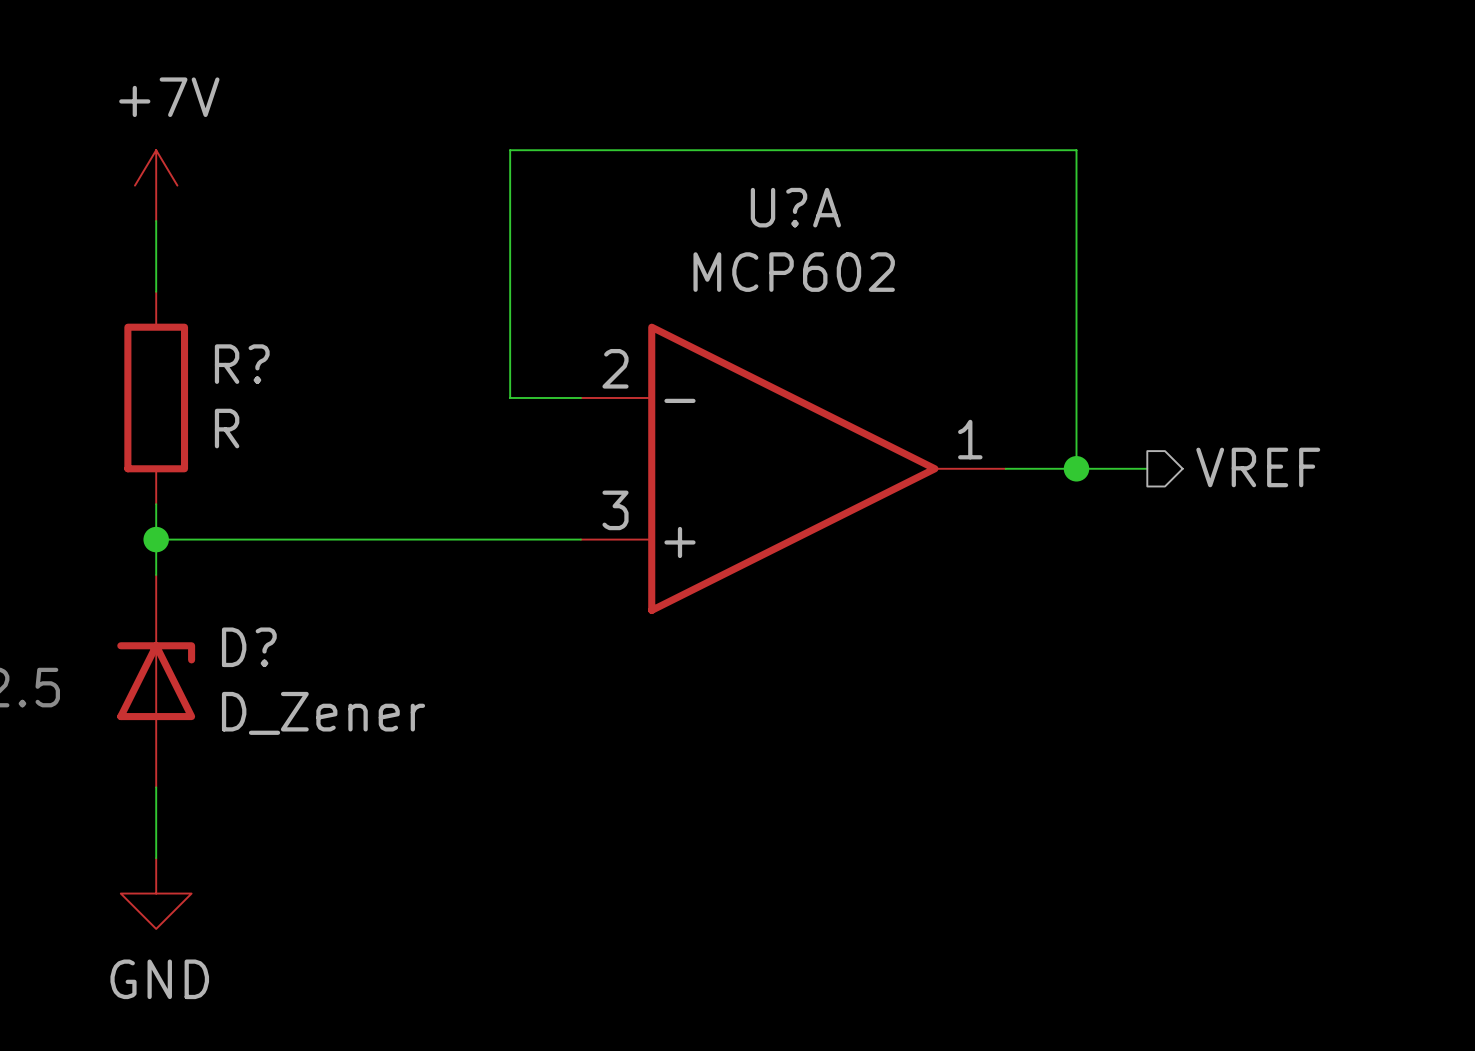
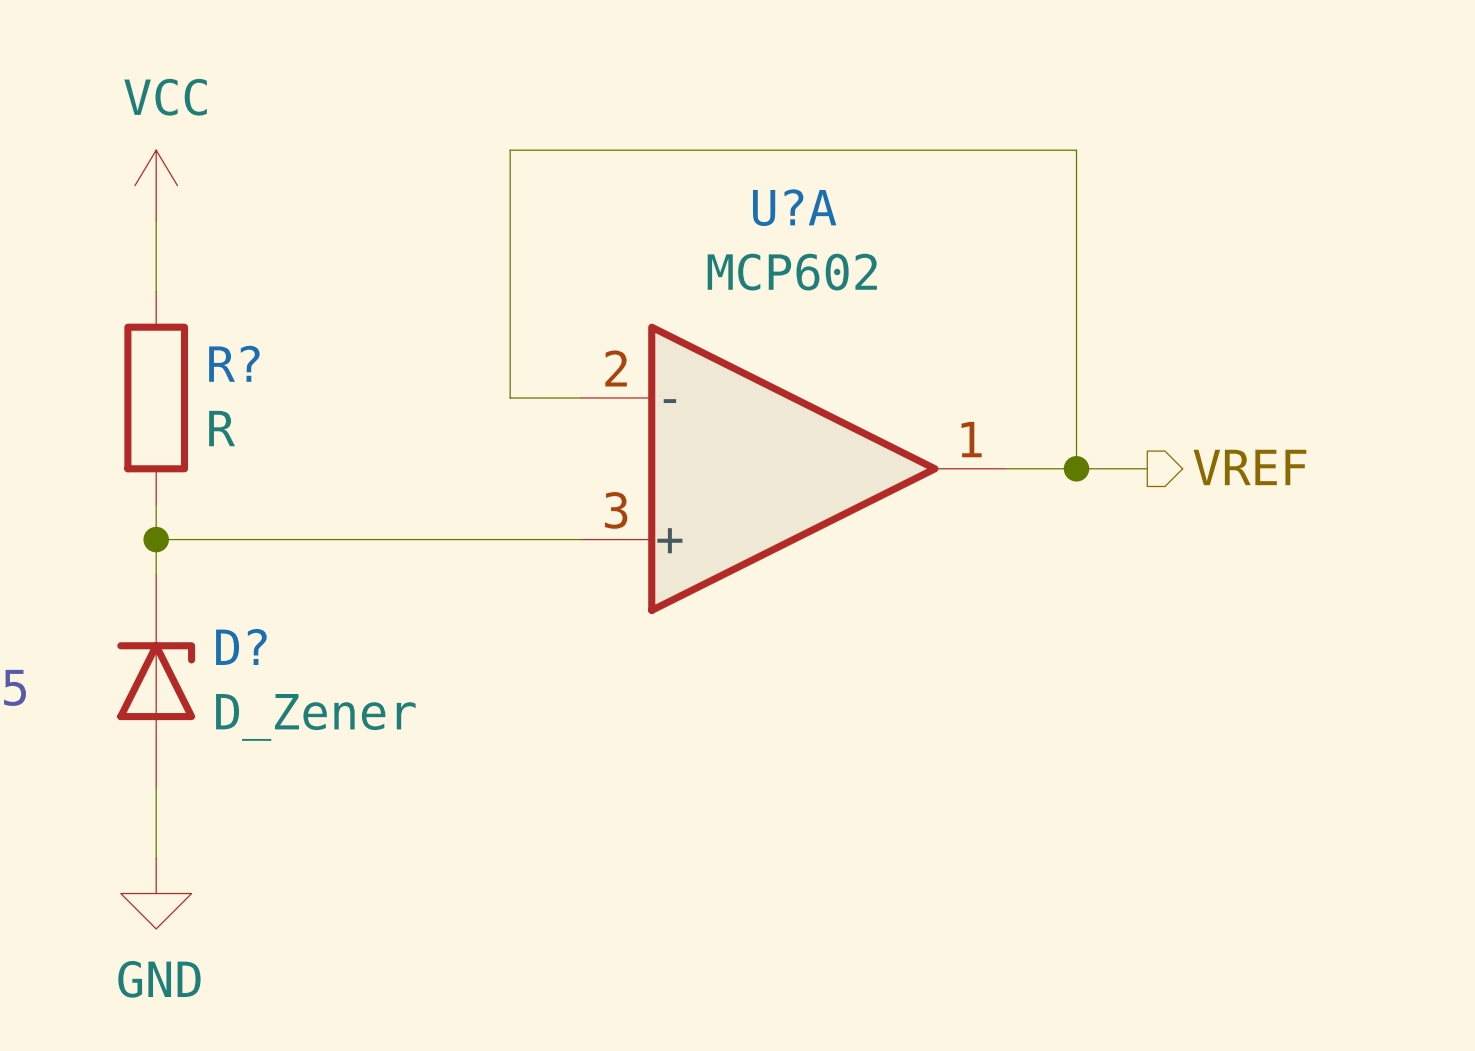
power symbol: +7V (156, 185) -> VCC (156, 185)

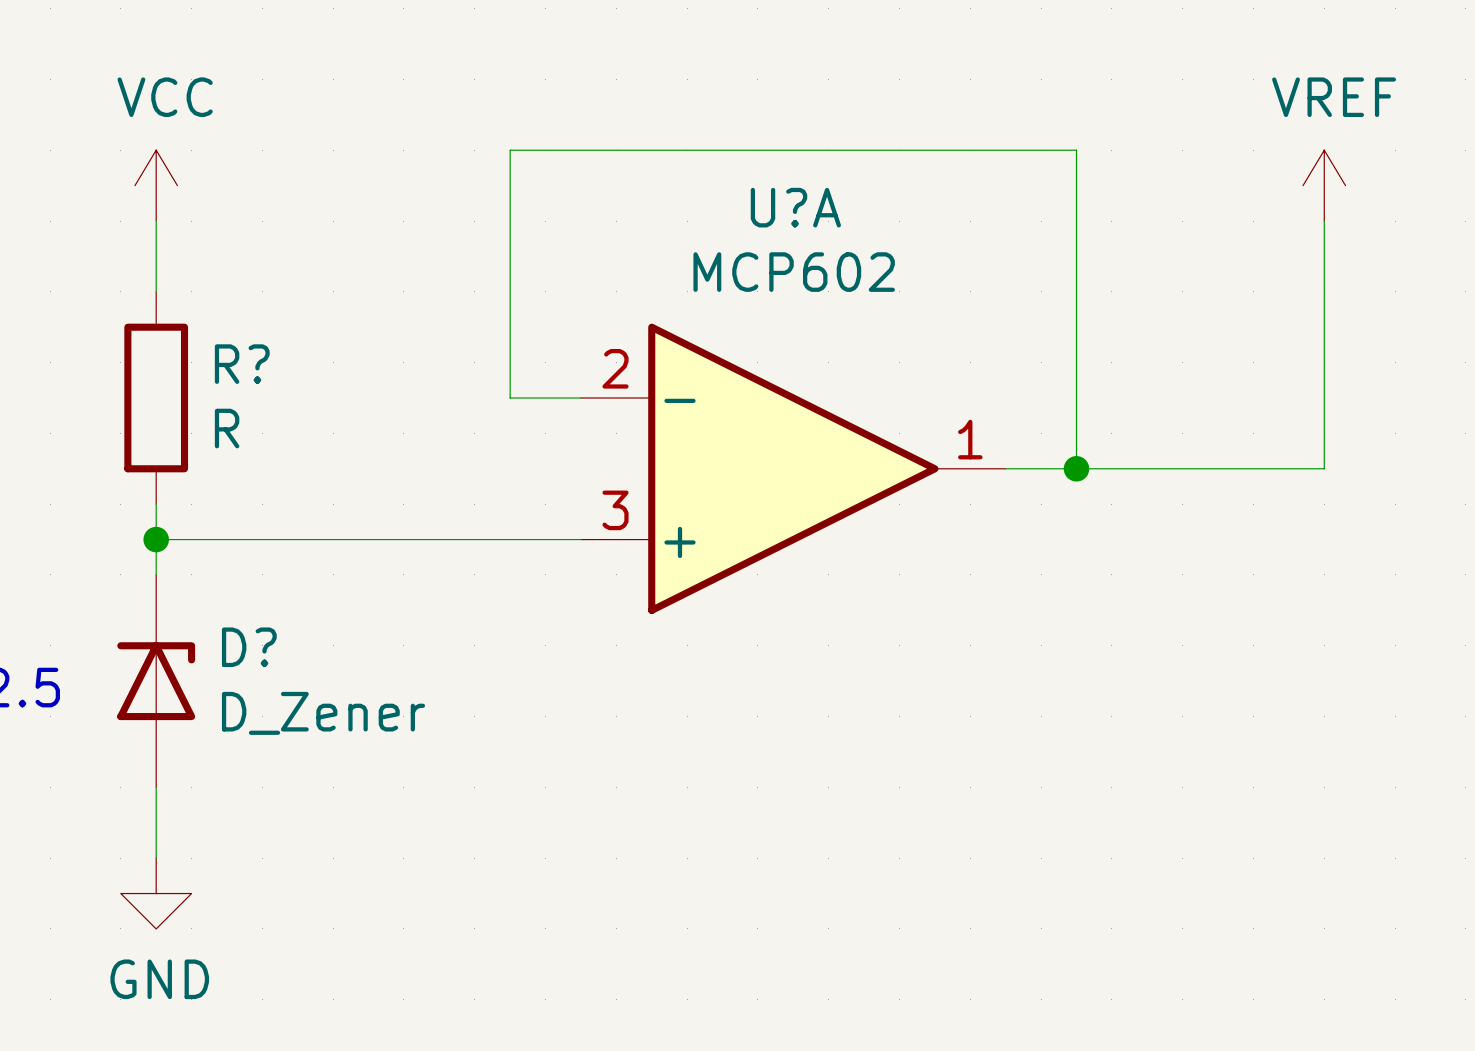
power symbol: none -> VREF (1324, 185)
wire: none -> (1324, 221) (1324, 468) (1147, 468)
hierarchical label: VREF (1249, 467) -> none

